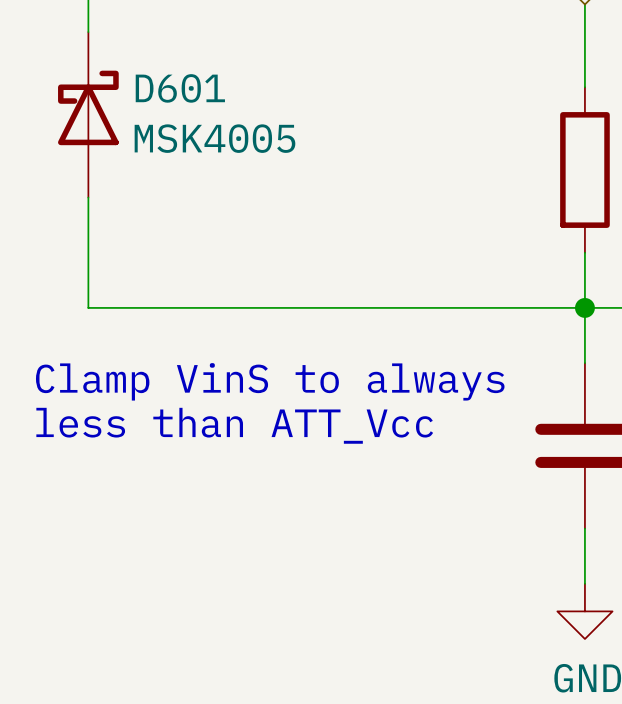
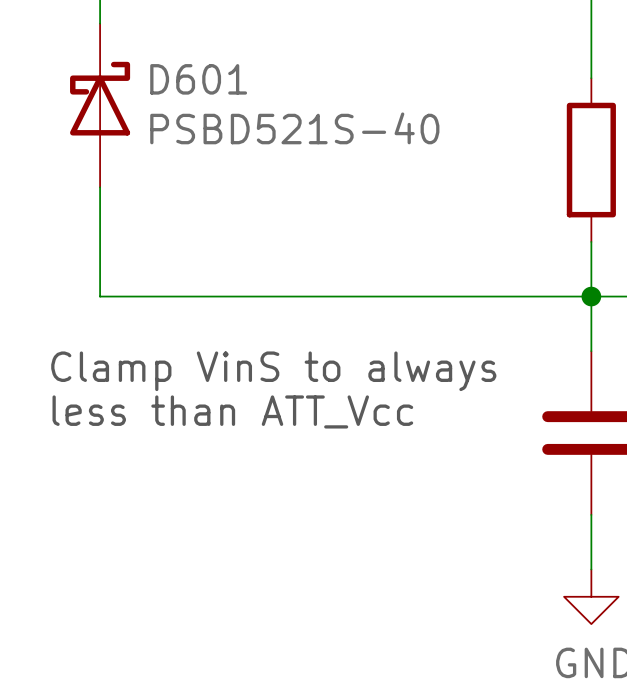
D601 value: MSK4005 (214, 138) -> PSBD521S-40 (294, 128)

